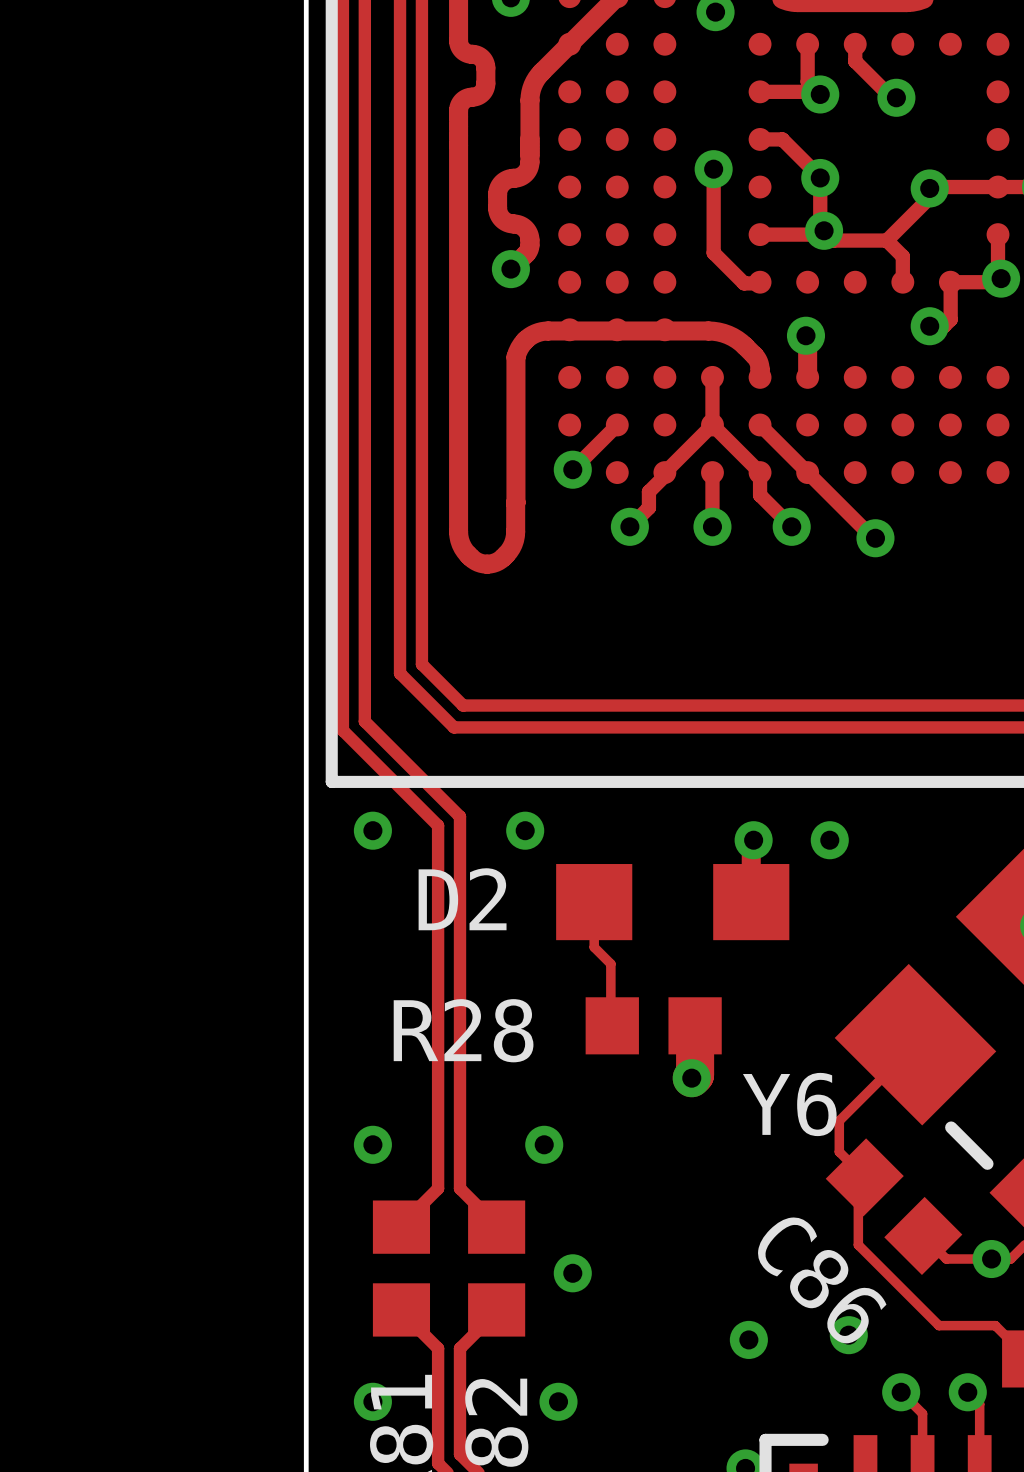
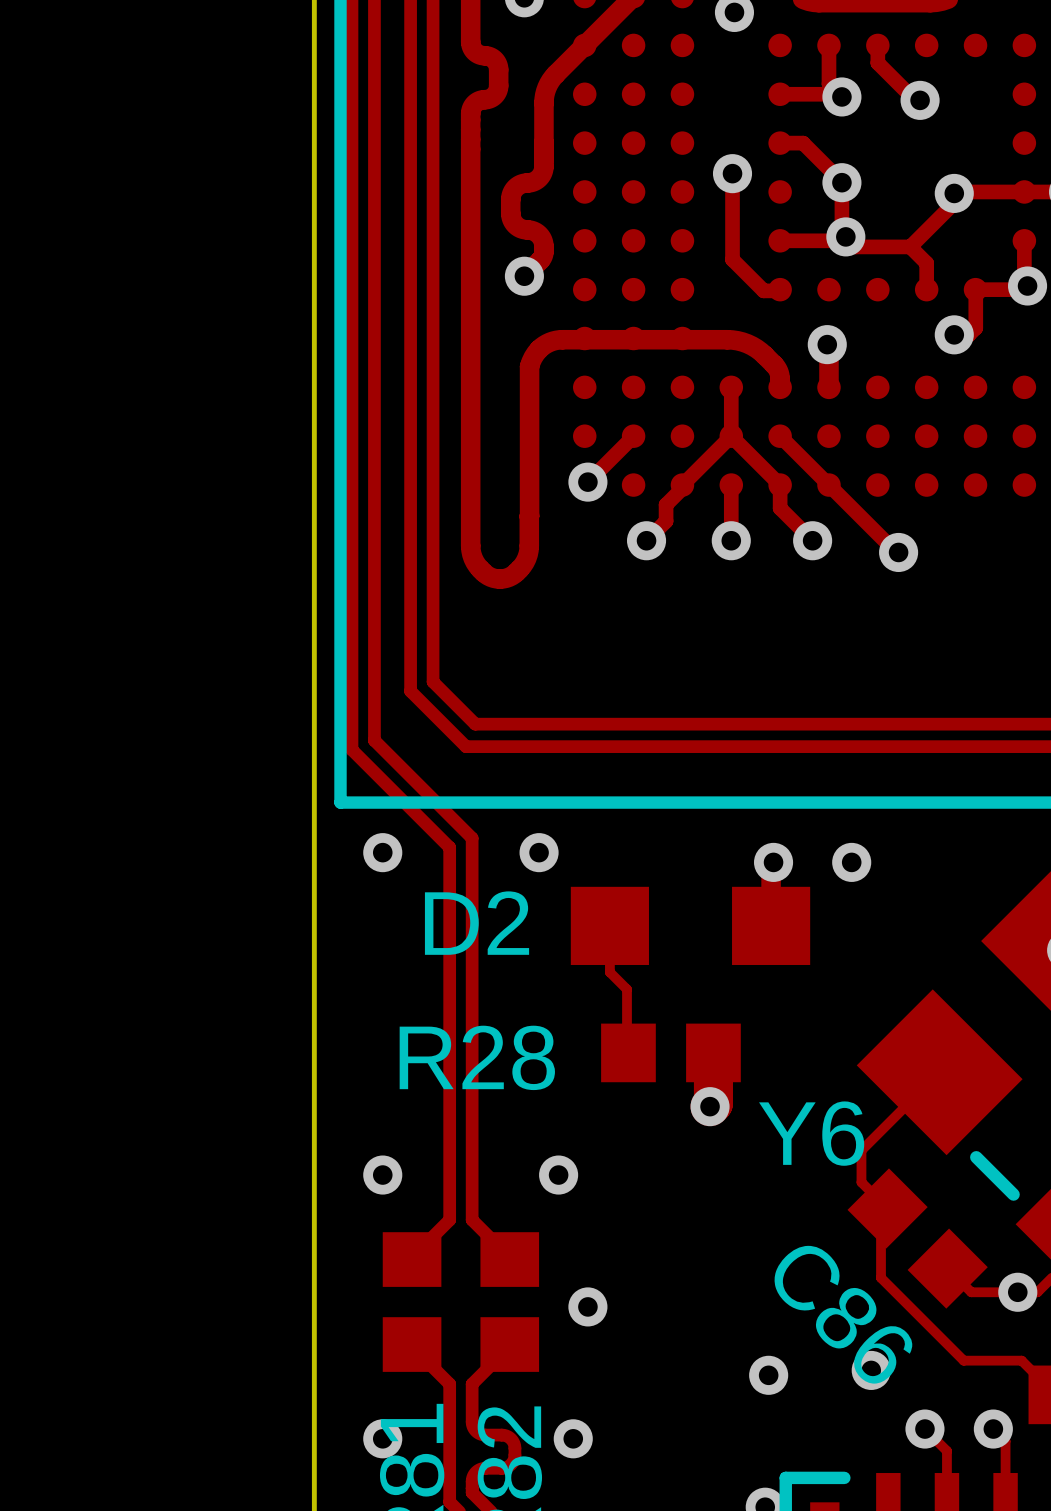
track: (460, 1385) (460, 1443) -> (472, 1421) (474, 1428) (479, 1433) (508, 1437) (513, 1442) (514, 1448) (514, 1459) (509, 1465) (503, 1468) (479, 1469) (474, 1474) (472, 1481)

